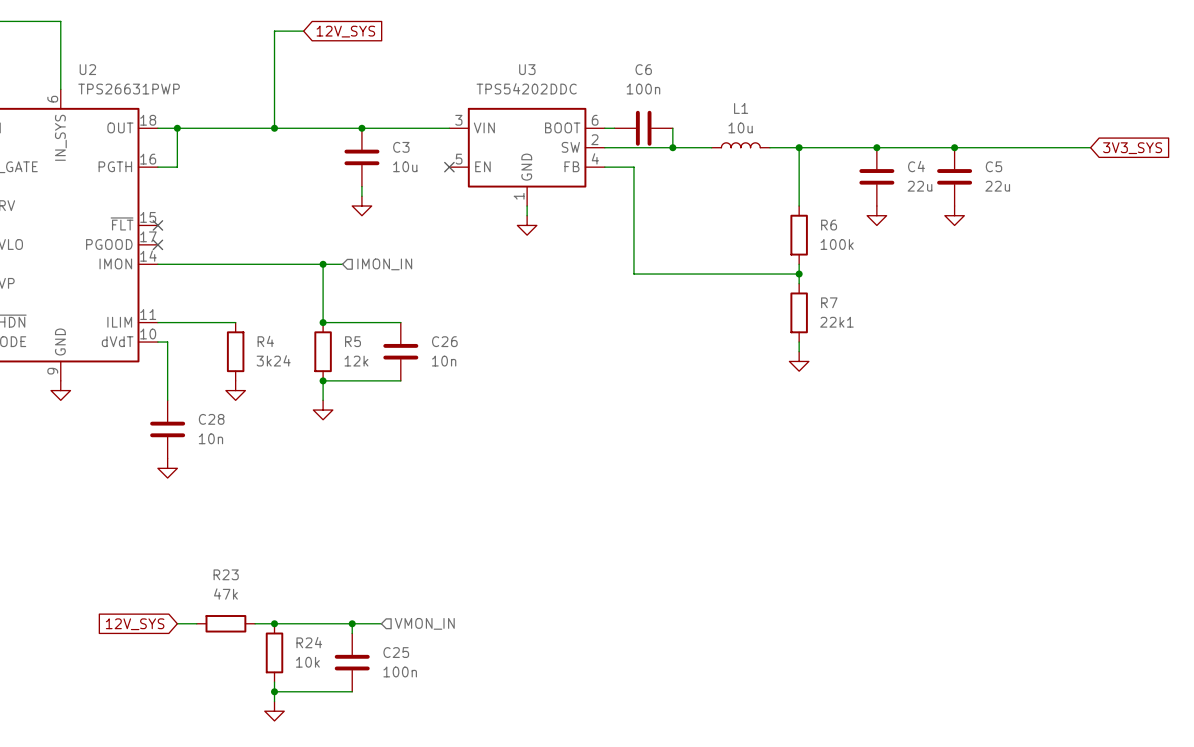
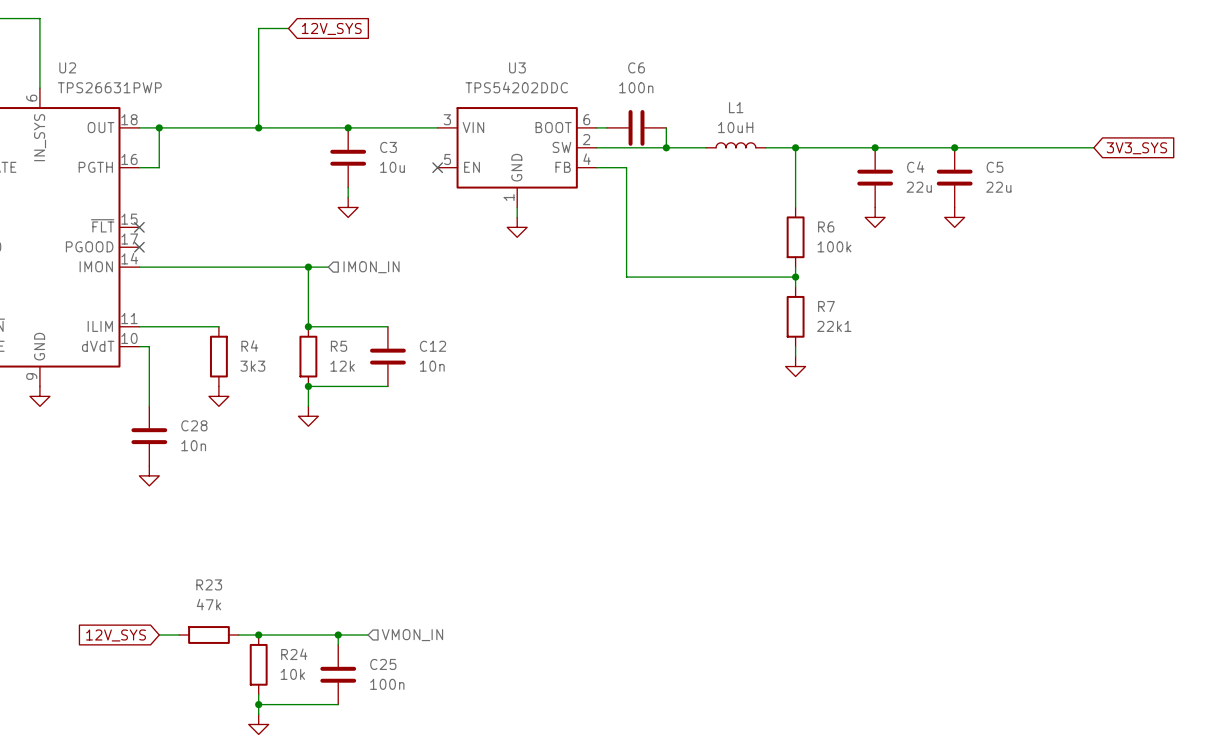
L1 value: 10u (740, 127) -> 10uH (735, 127)
C26 name: C26 (444, 341) -> C12 (433, 346)
R4 value: 3k24 (273, 360) -> 3k3 (252, 366)

